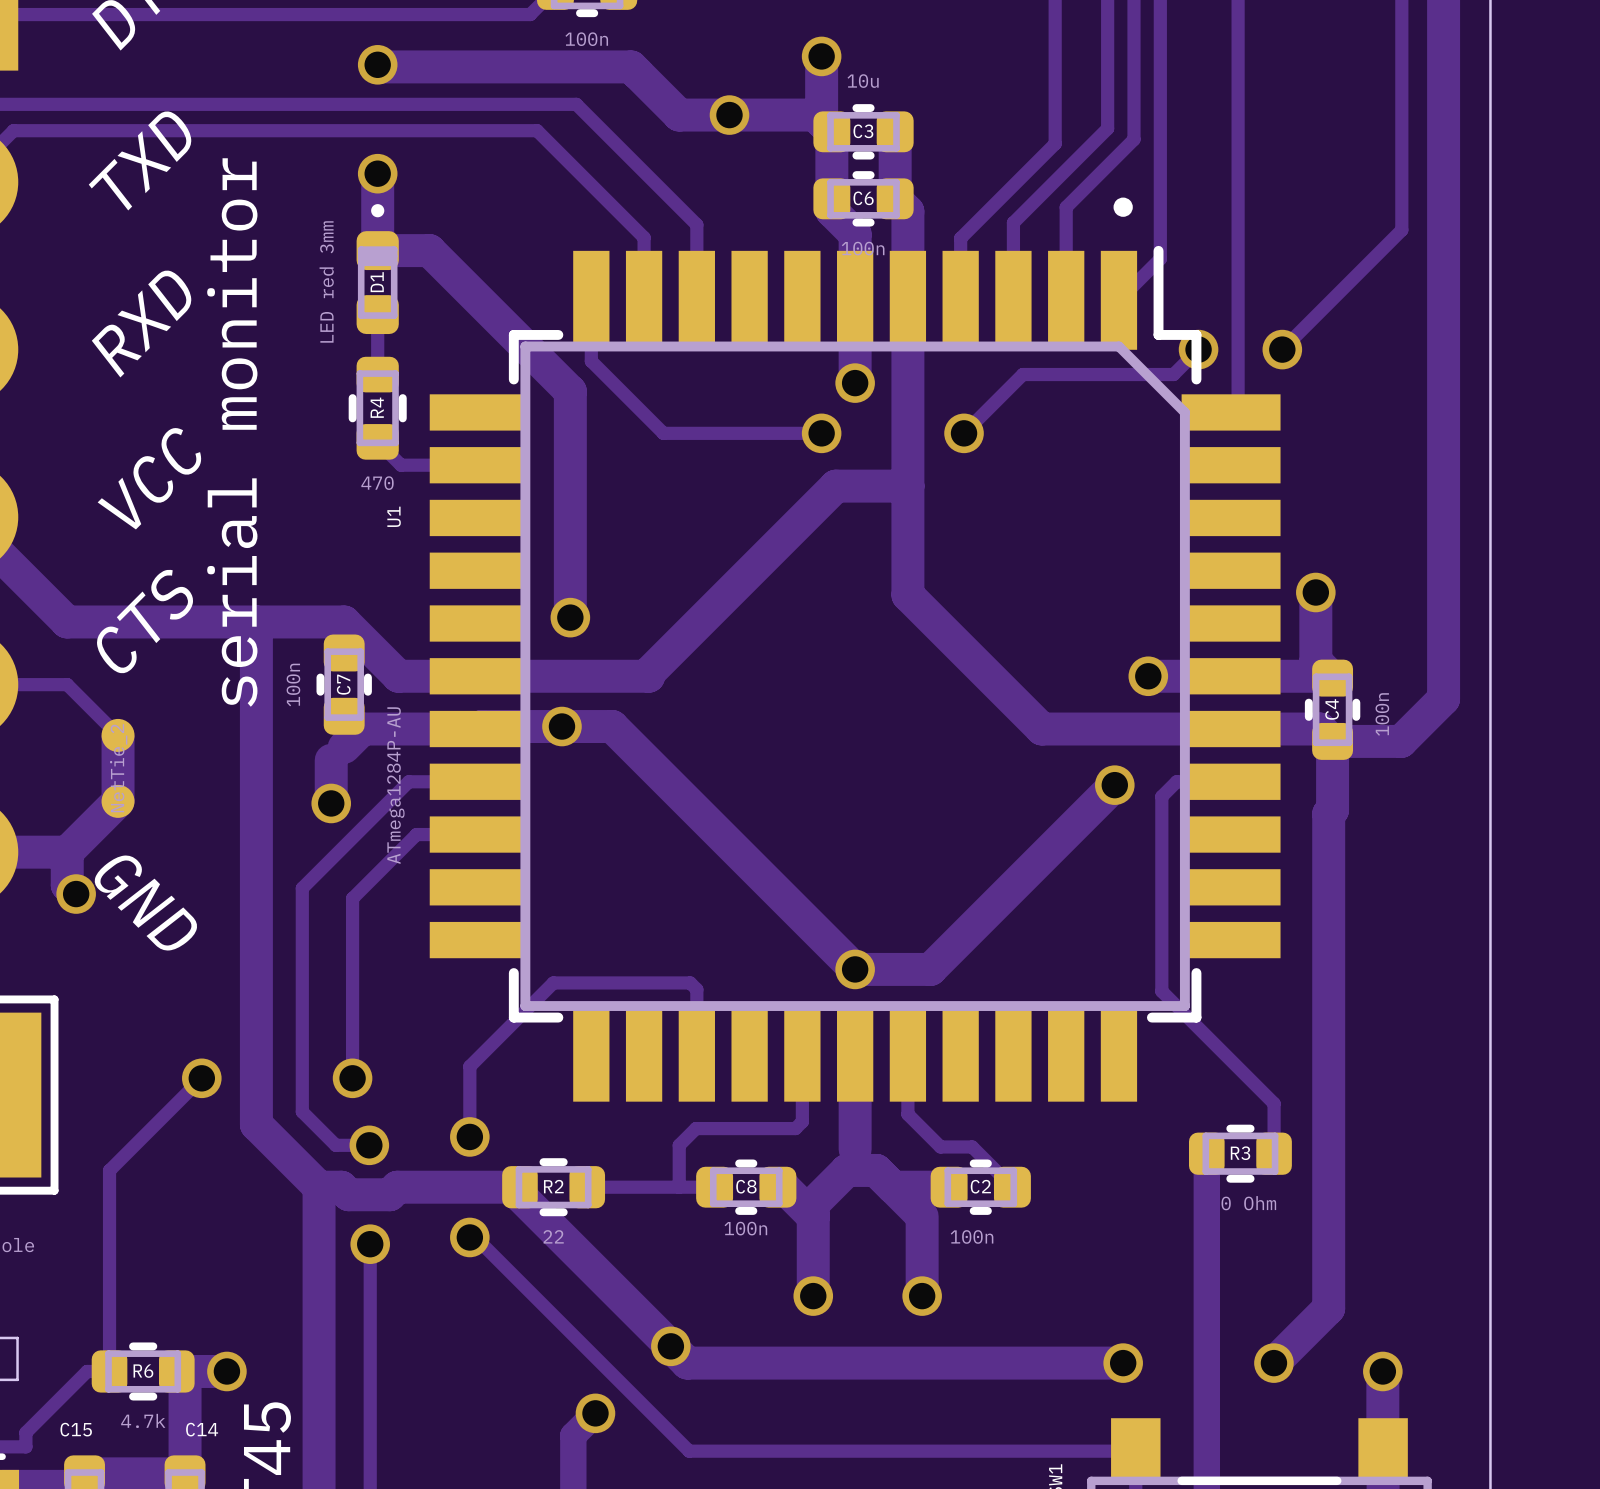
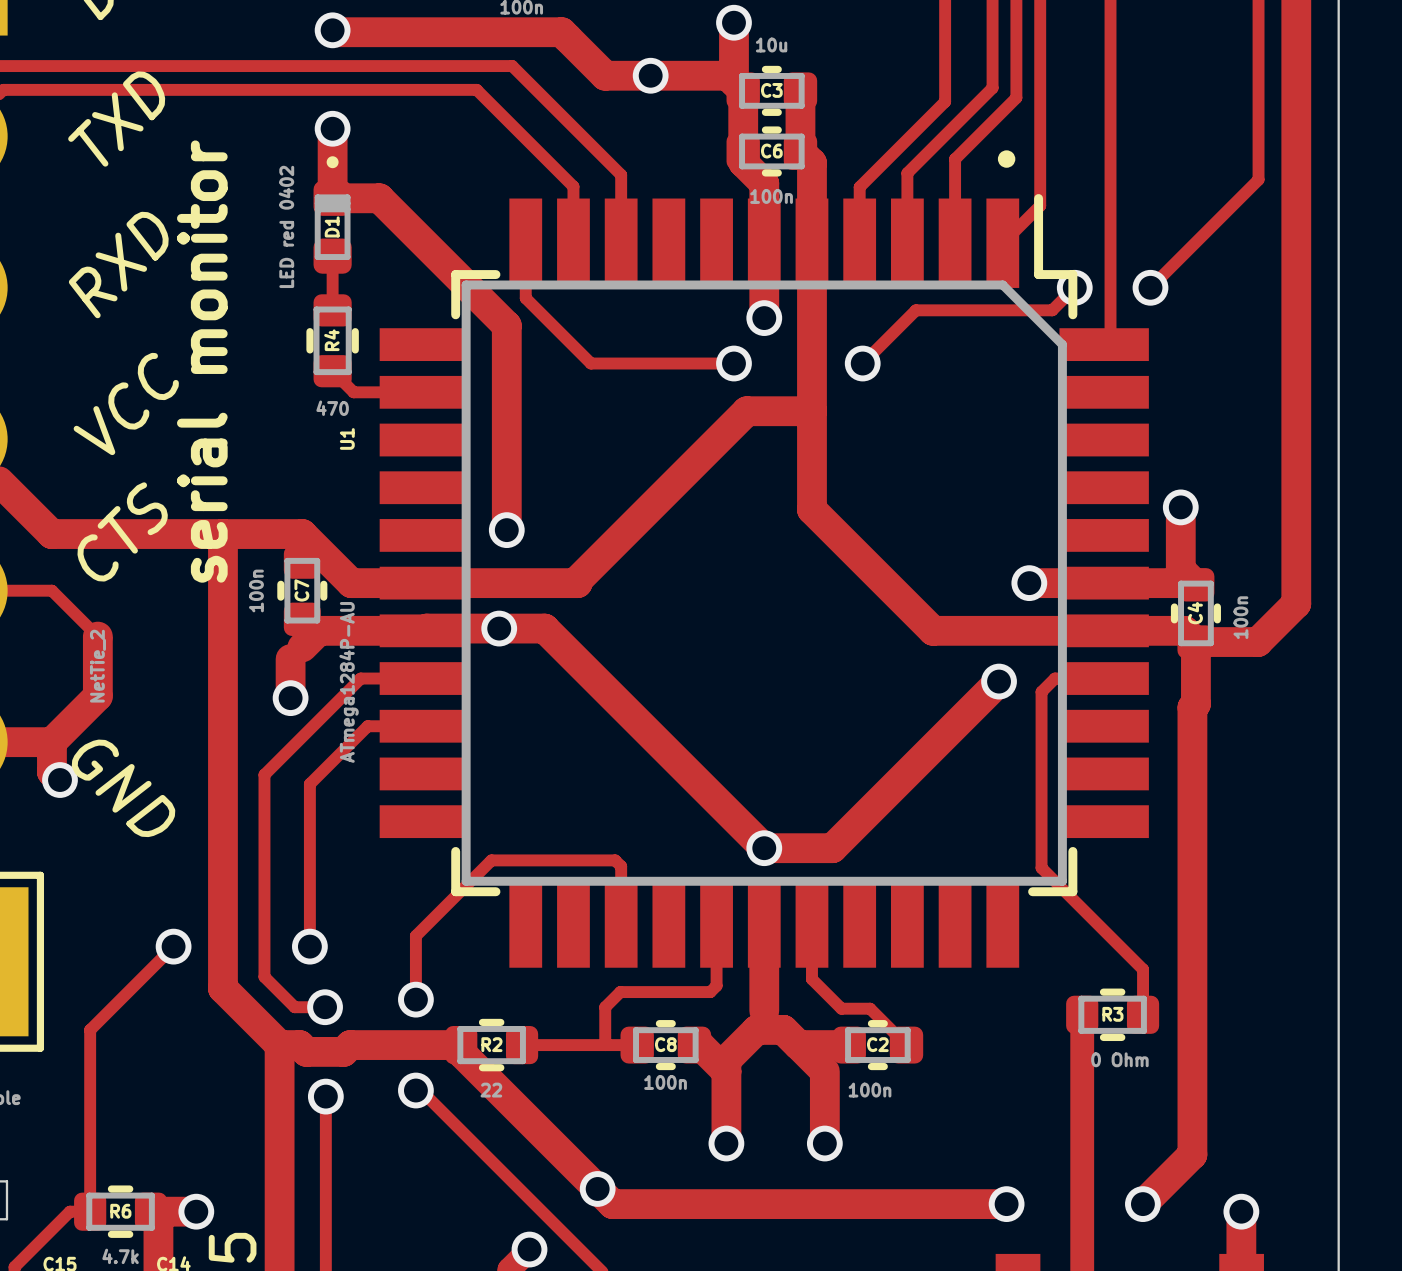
D1 value: LED red 3mm (326, 281) -> LED red 0402 (286, 226)

